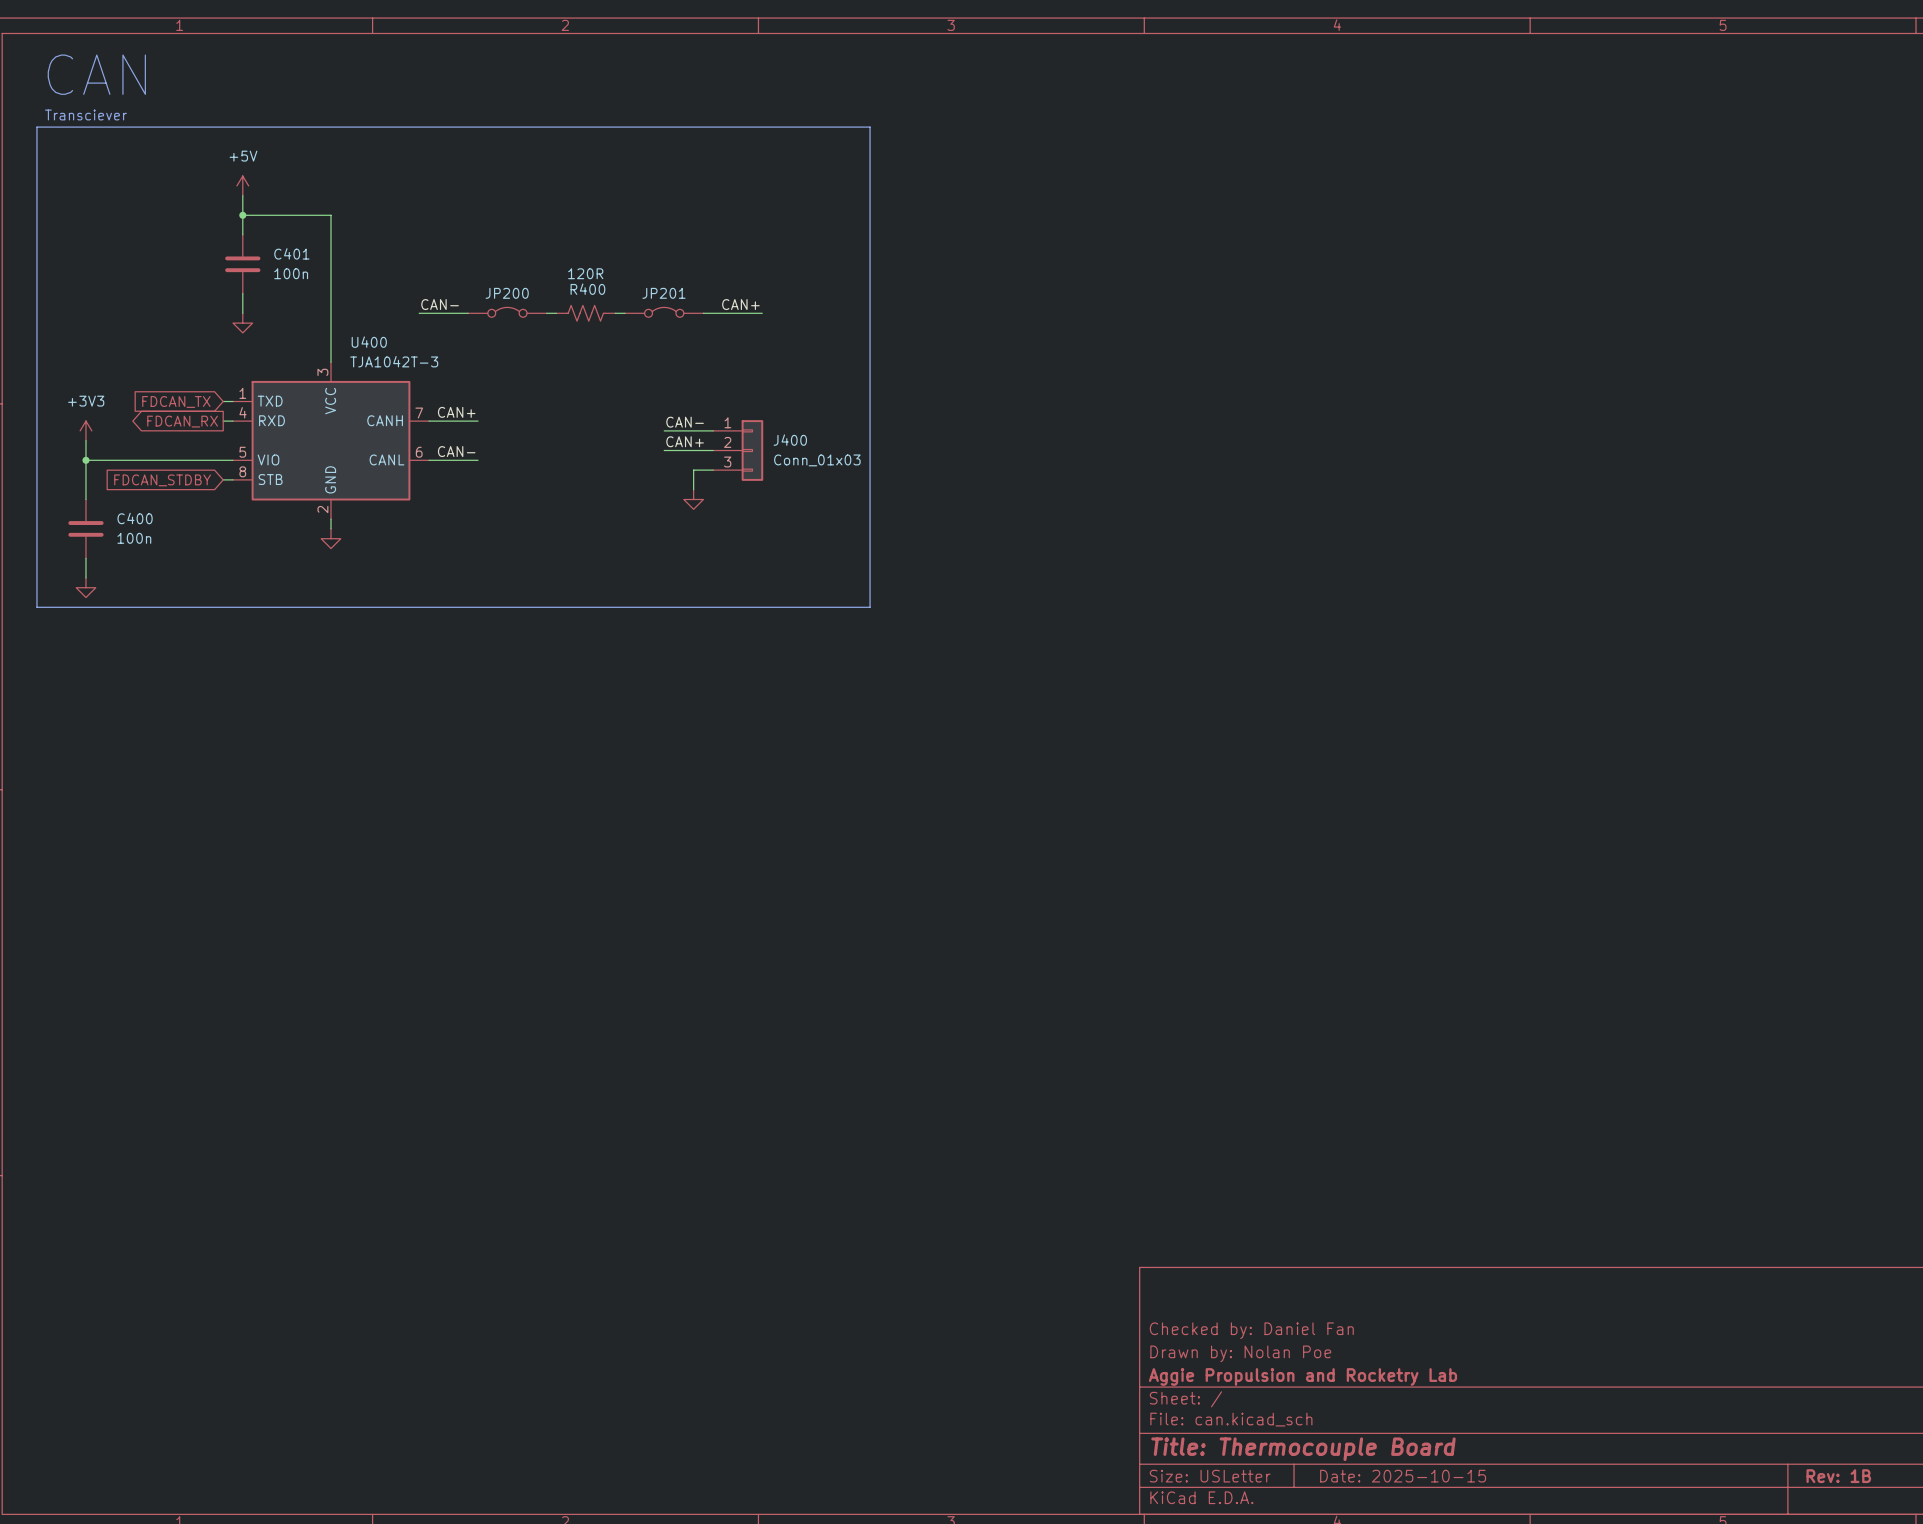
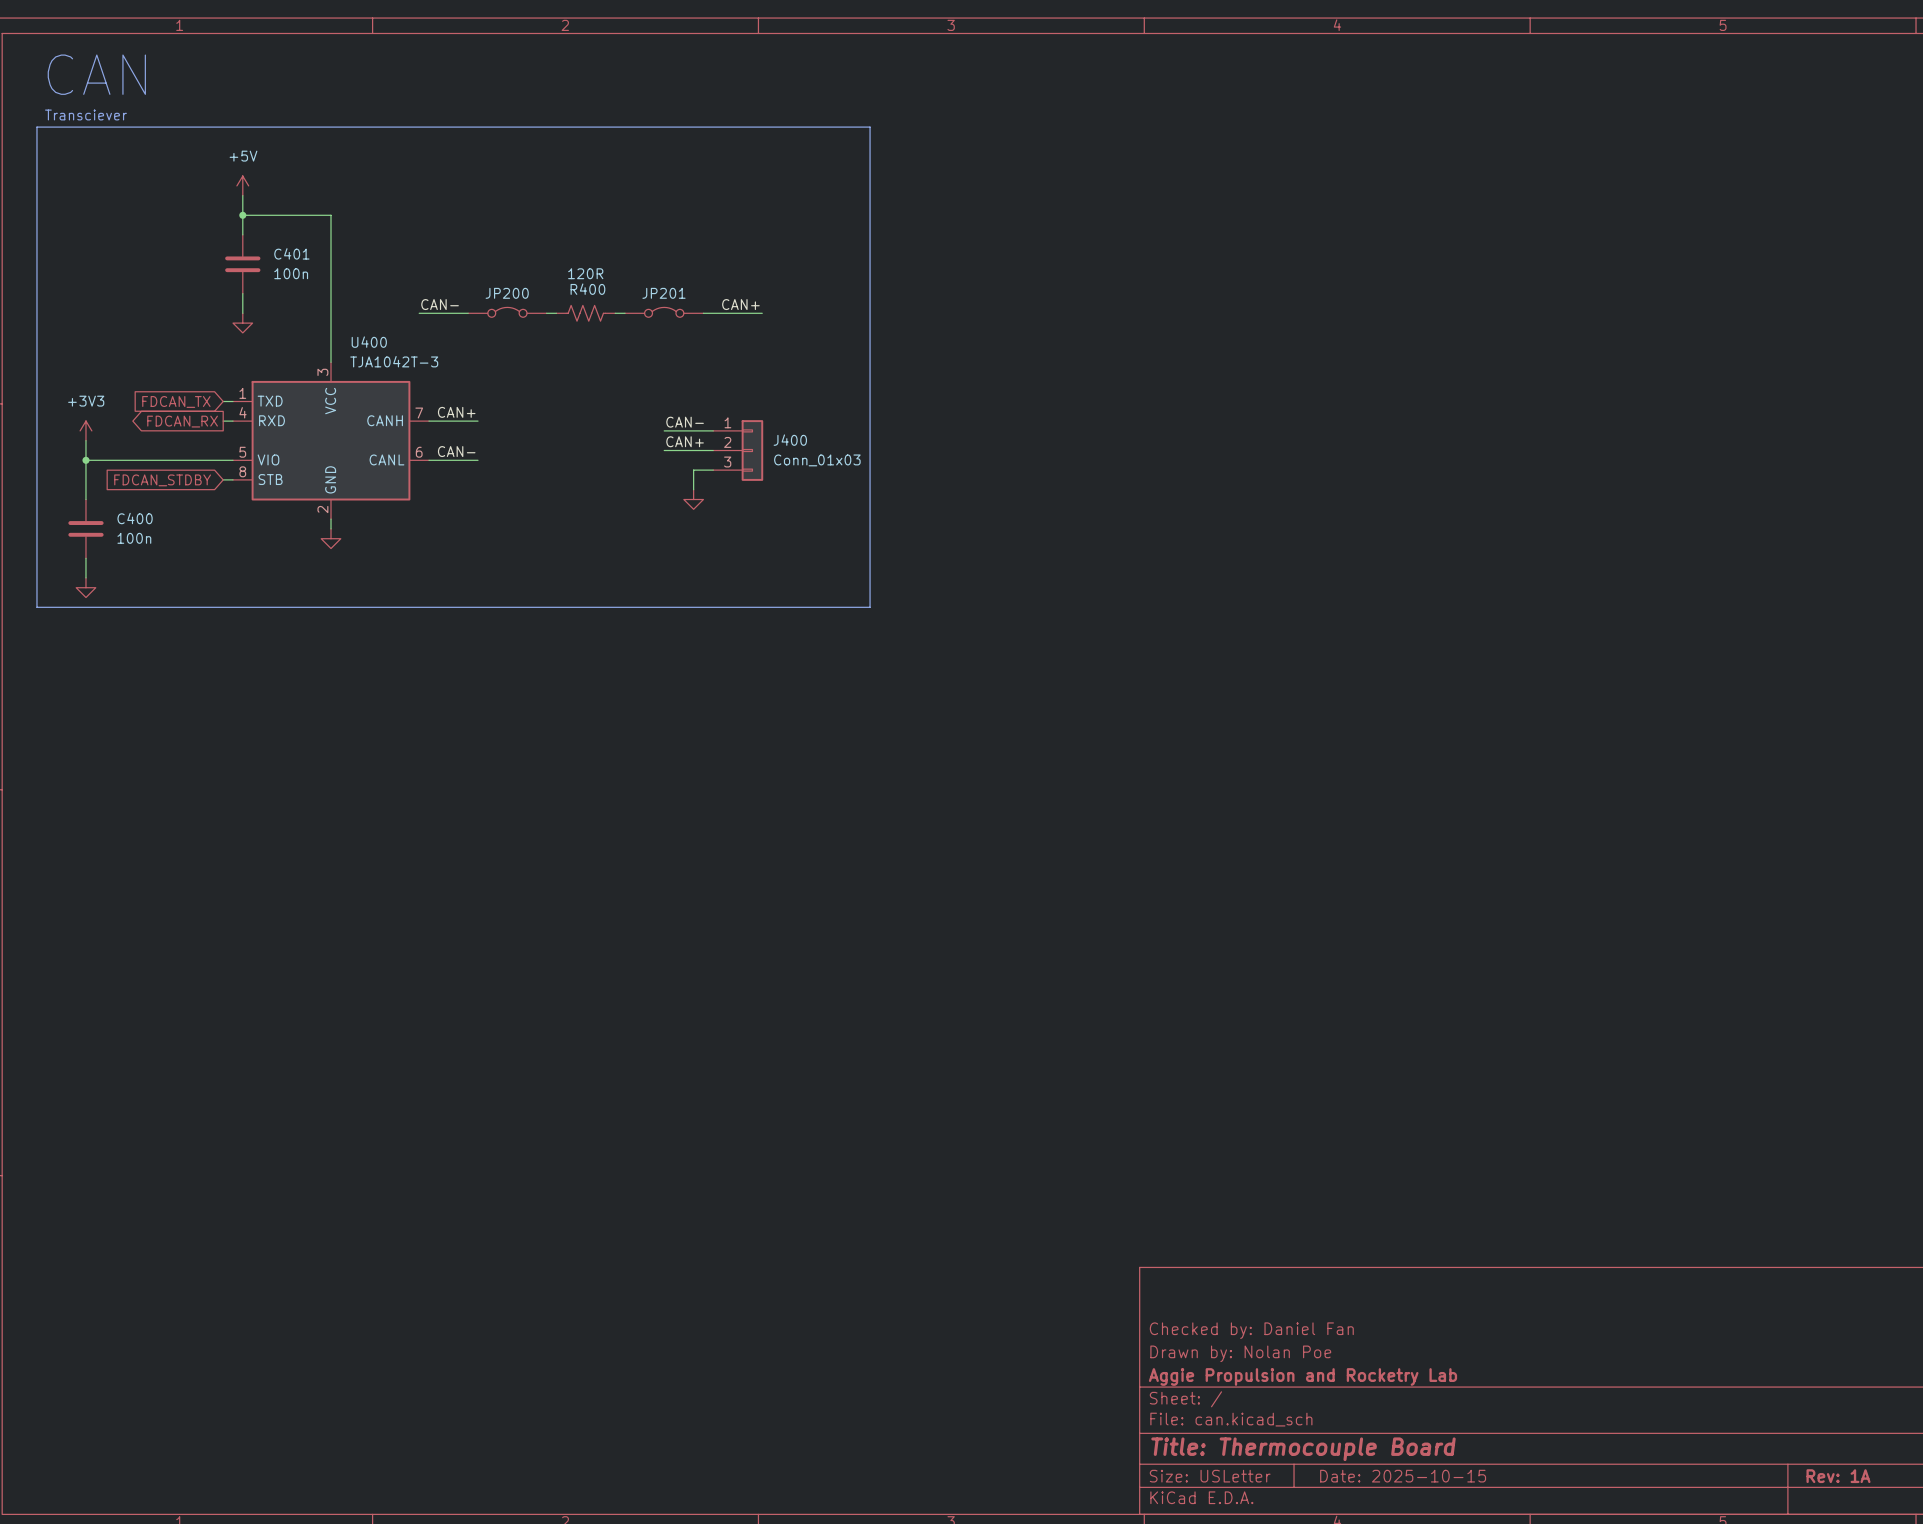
title block: Rev: 1B (1838, 1476) -> Rev: 1A (1838, 1476)

